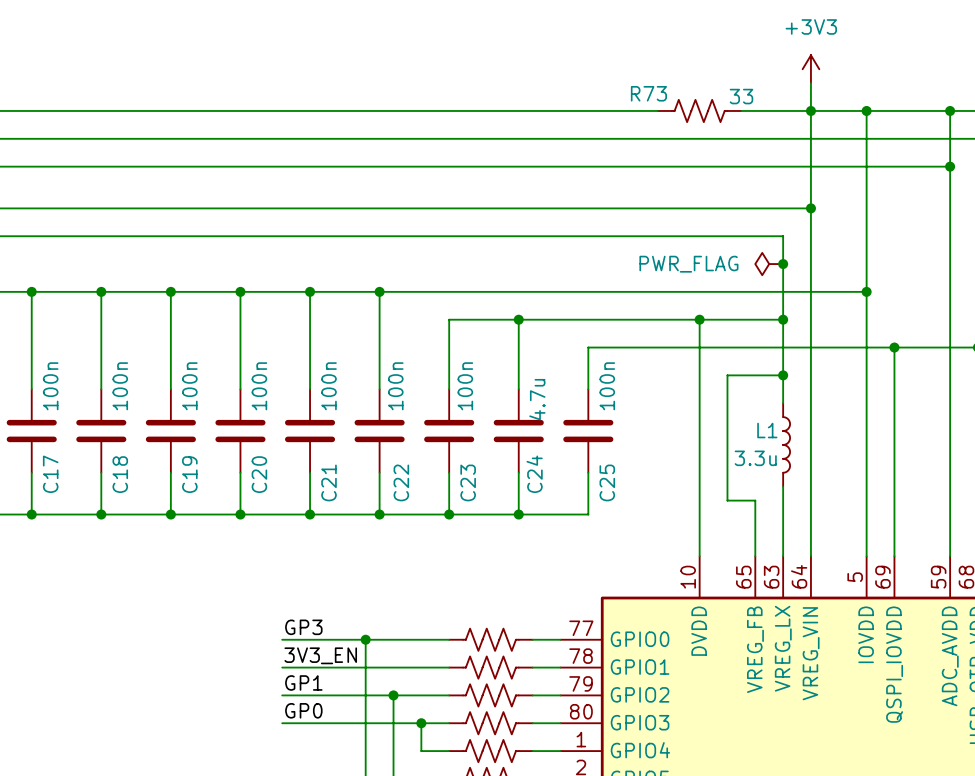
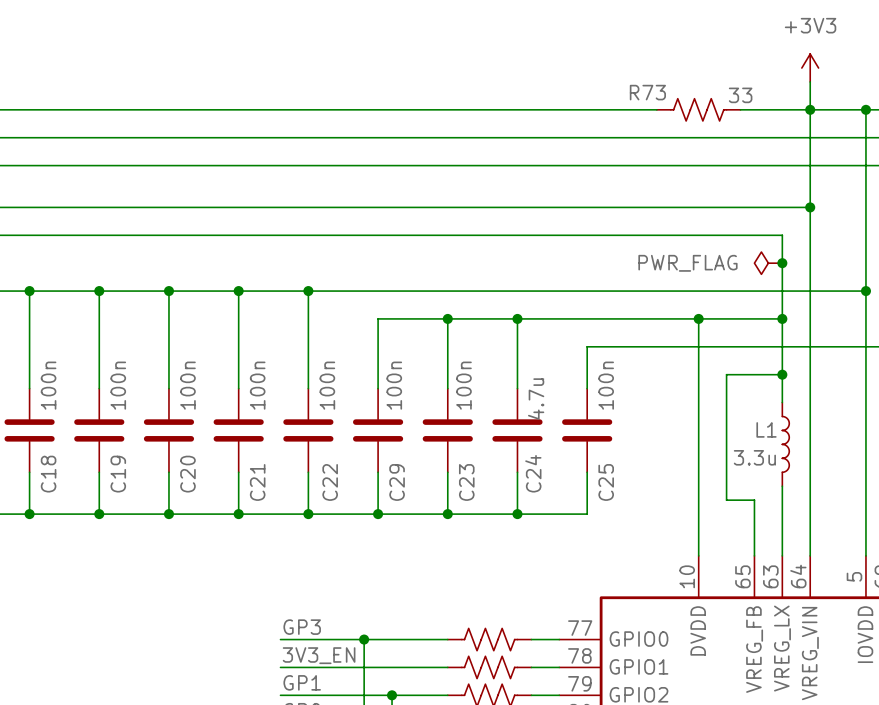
wire: (379, 291) (379, 319) -> (447, 318) (378, 318)
junction: (379, 291) -> none
junction: none -> (447, 318)
C17 name: C17 (50, 474) -> C18 (48, 474)
C18 name: C18 (120, 474) -> C19 (118, 474)
C19 name: C19 (189, 474) -> C20 (187, 474)
C20 name: C20 (259, 474) -> C21 (257, 482)
C21 name: C21 (328, 482) -> C22 (330, 482)
C22 name: C22 (401, 482) -> C29 (397, 482)

